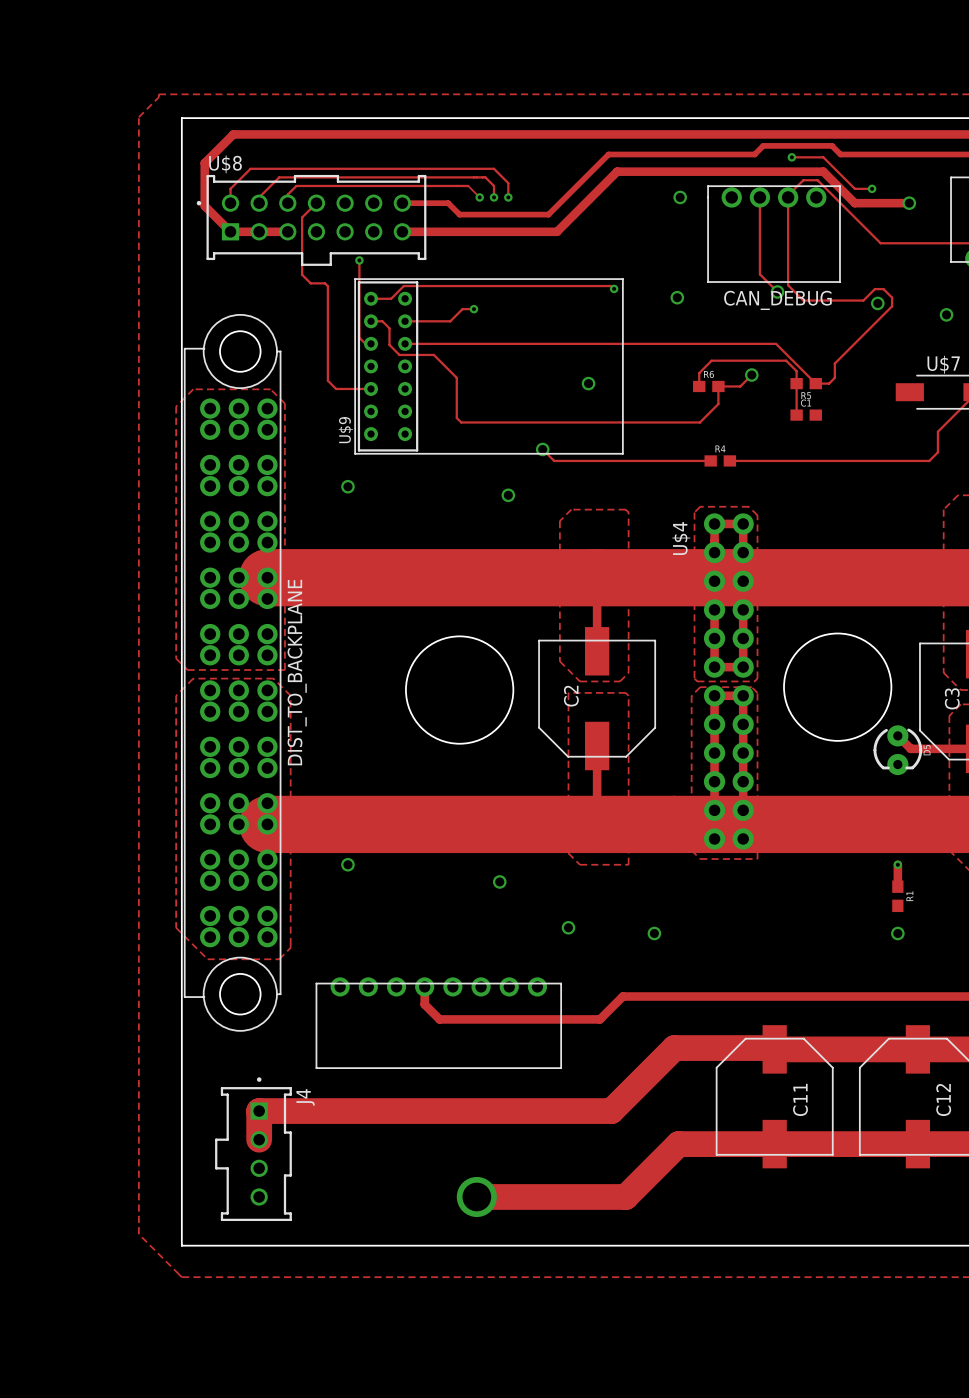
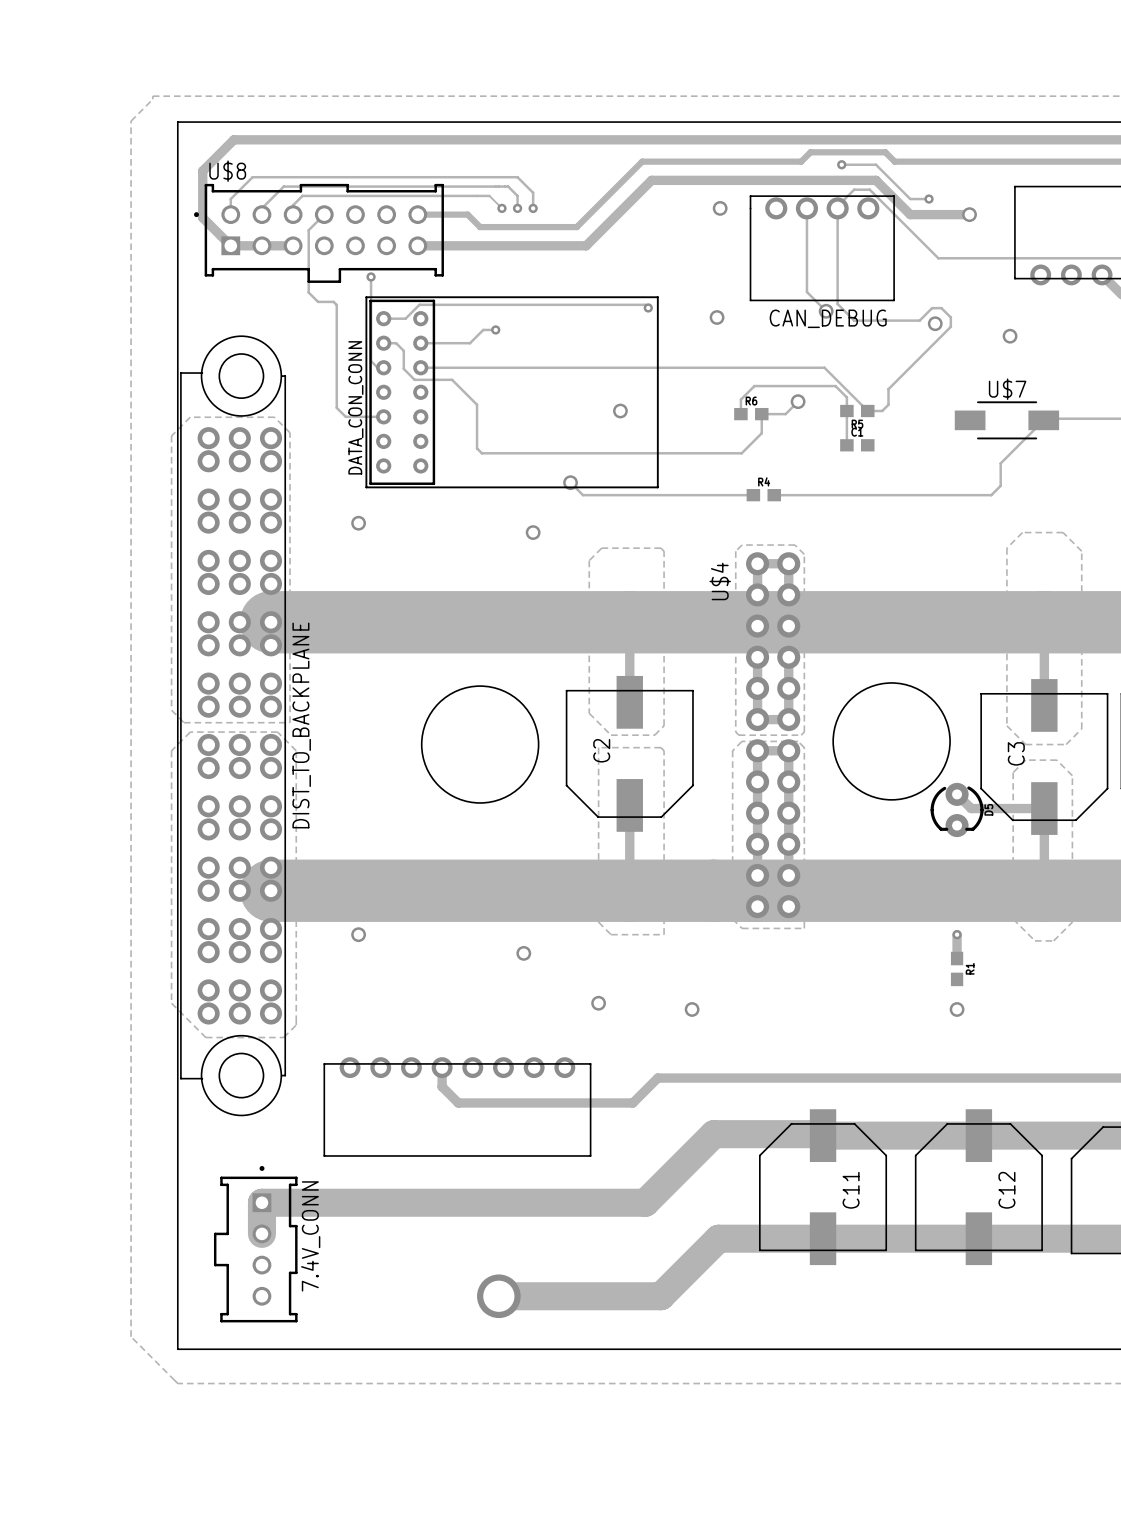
U$9 name: U$9 (345, 430) -> DATA_CON_CONN (355, 407)
J4 name: J4 (305, 1097) -> 7.4V_CONN (310, 1236)

